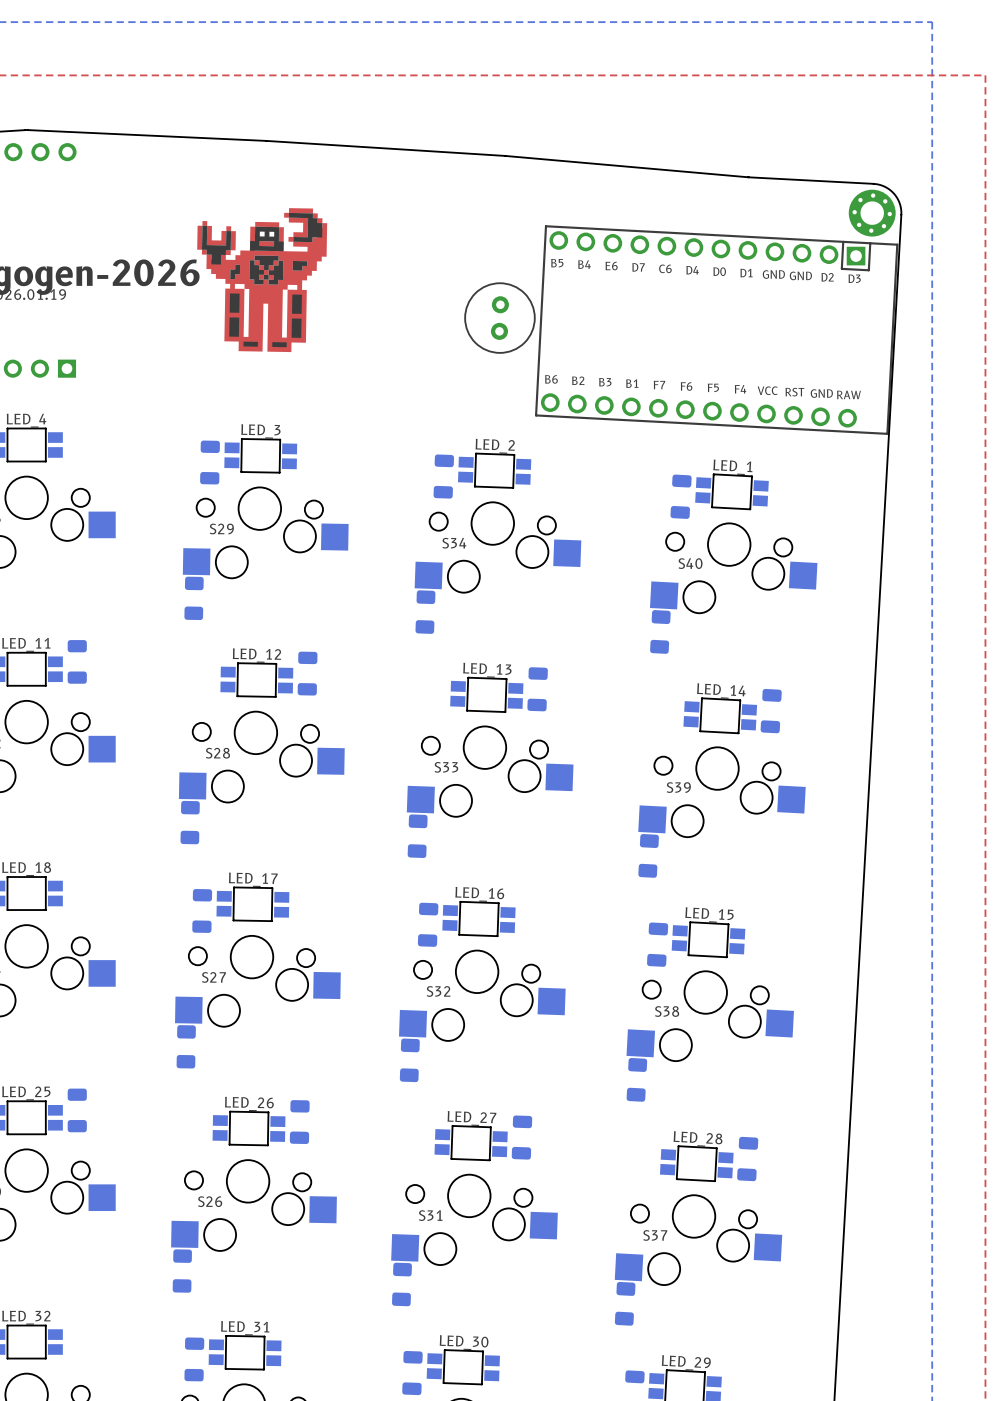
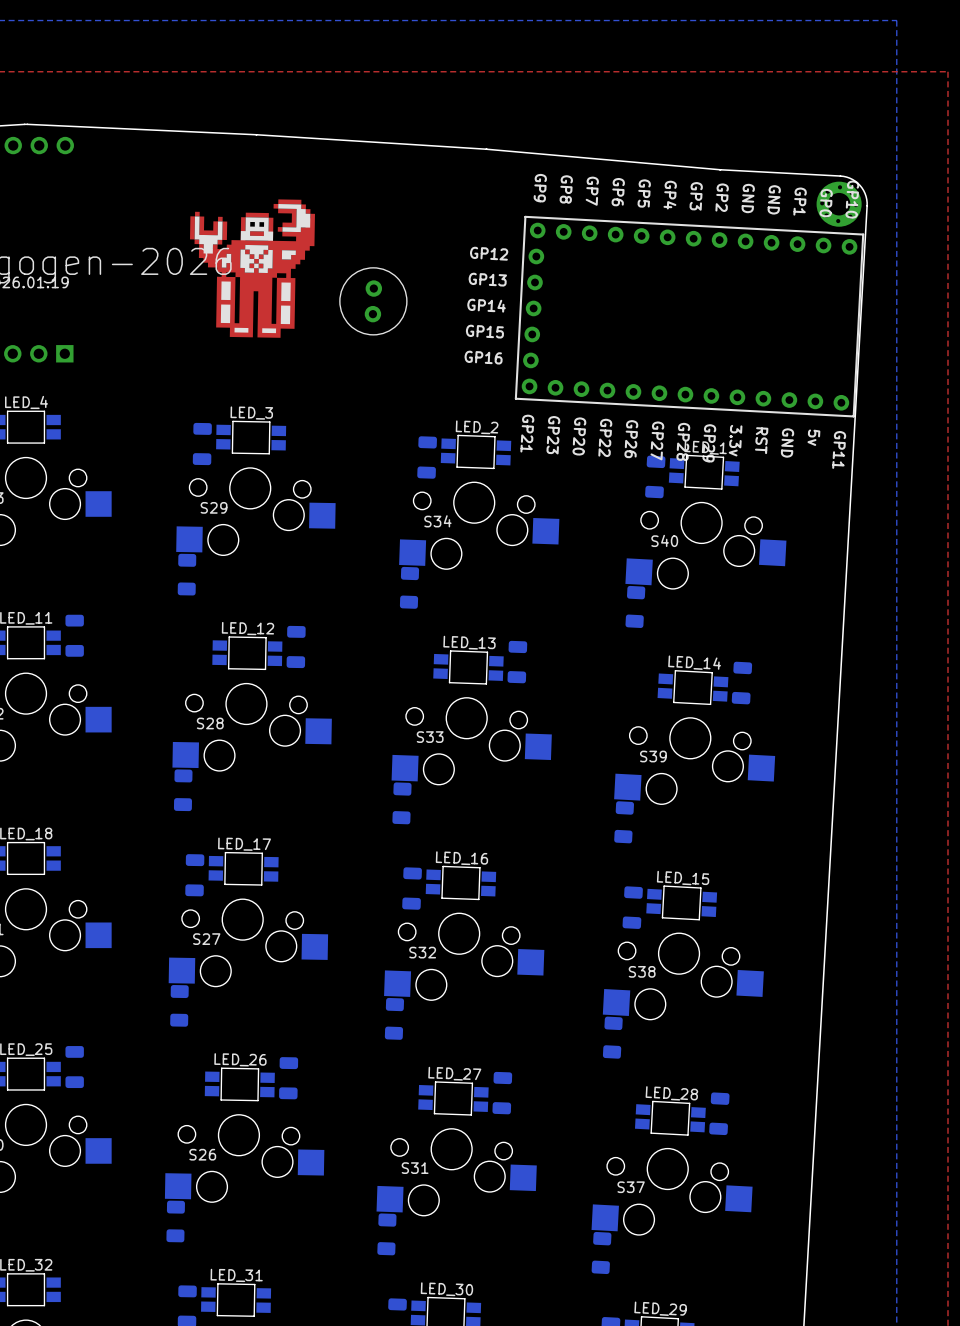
part footprint: [535, 225, 899, 435] -> [514, 215, 865, 418]
part position: (499, 318) -> (373, 301)

